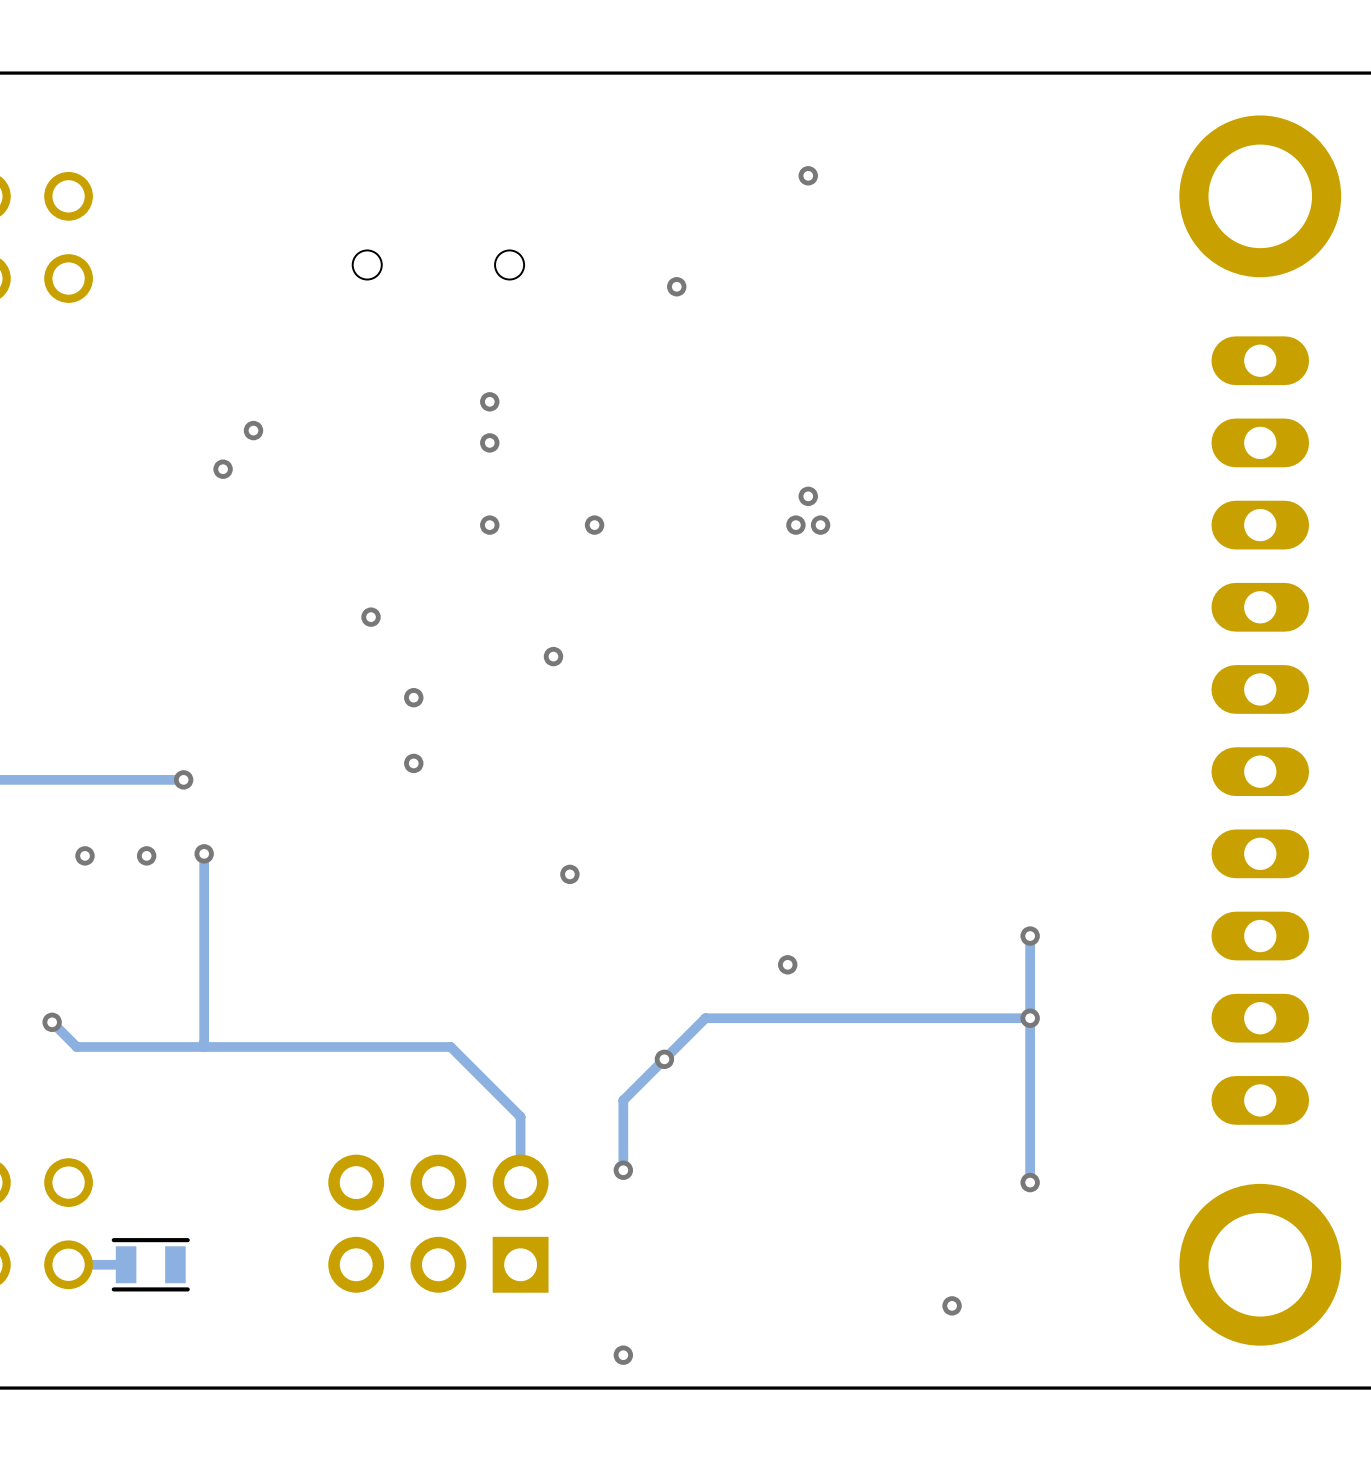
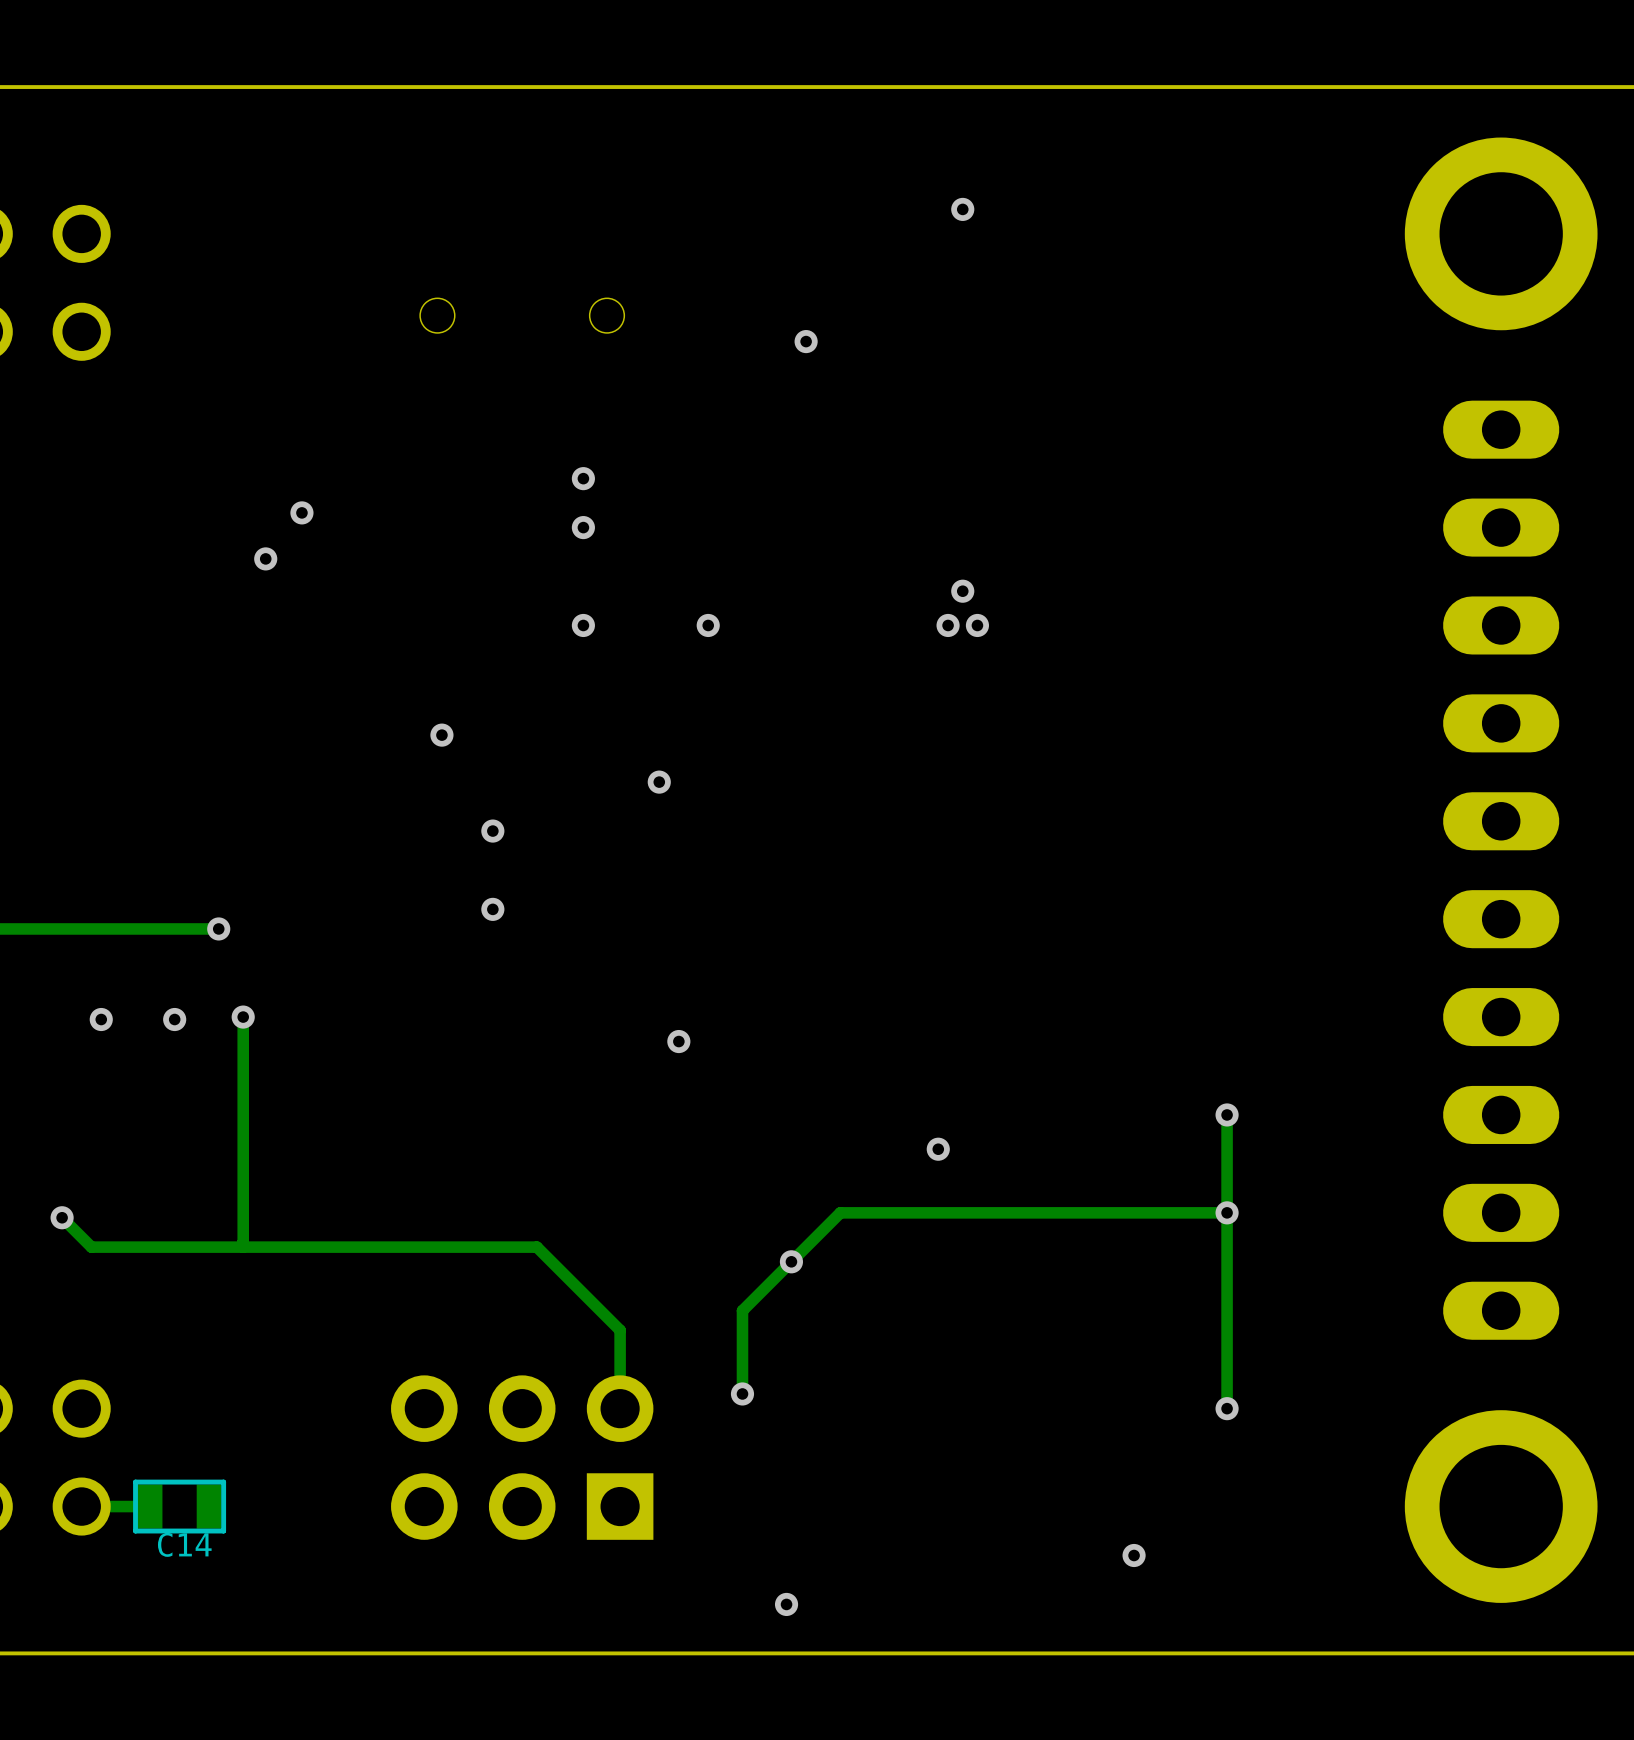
part: (150, 1264) -> none
C14: none -> (179, 1506)
via position: (623, 1355) -> (786, 1604)

